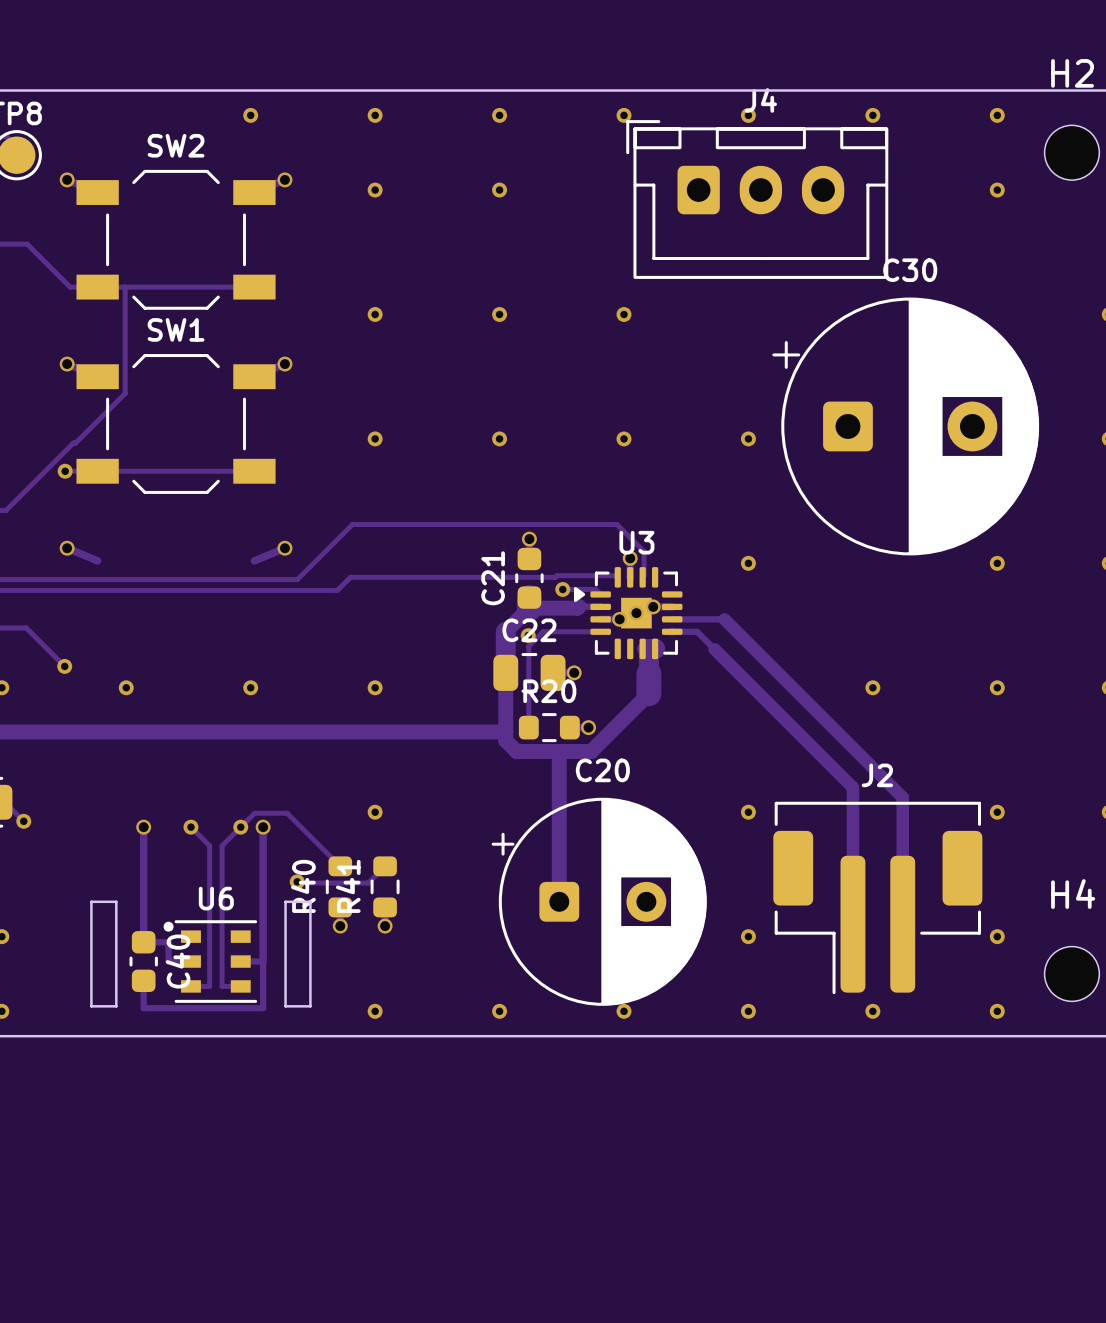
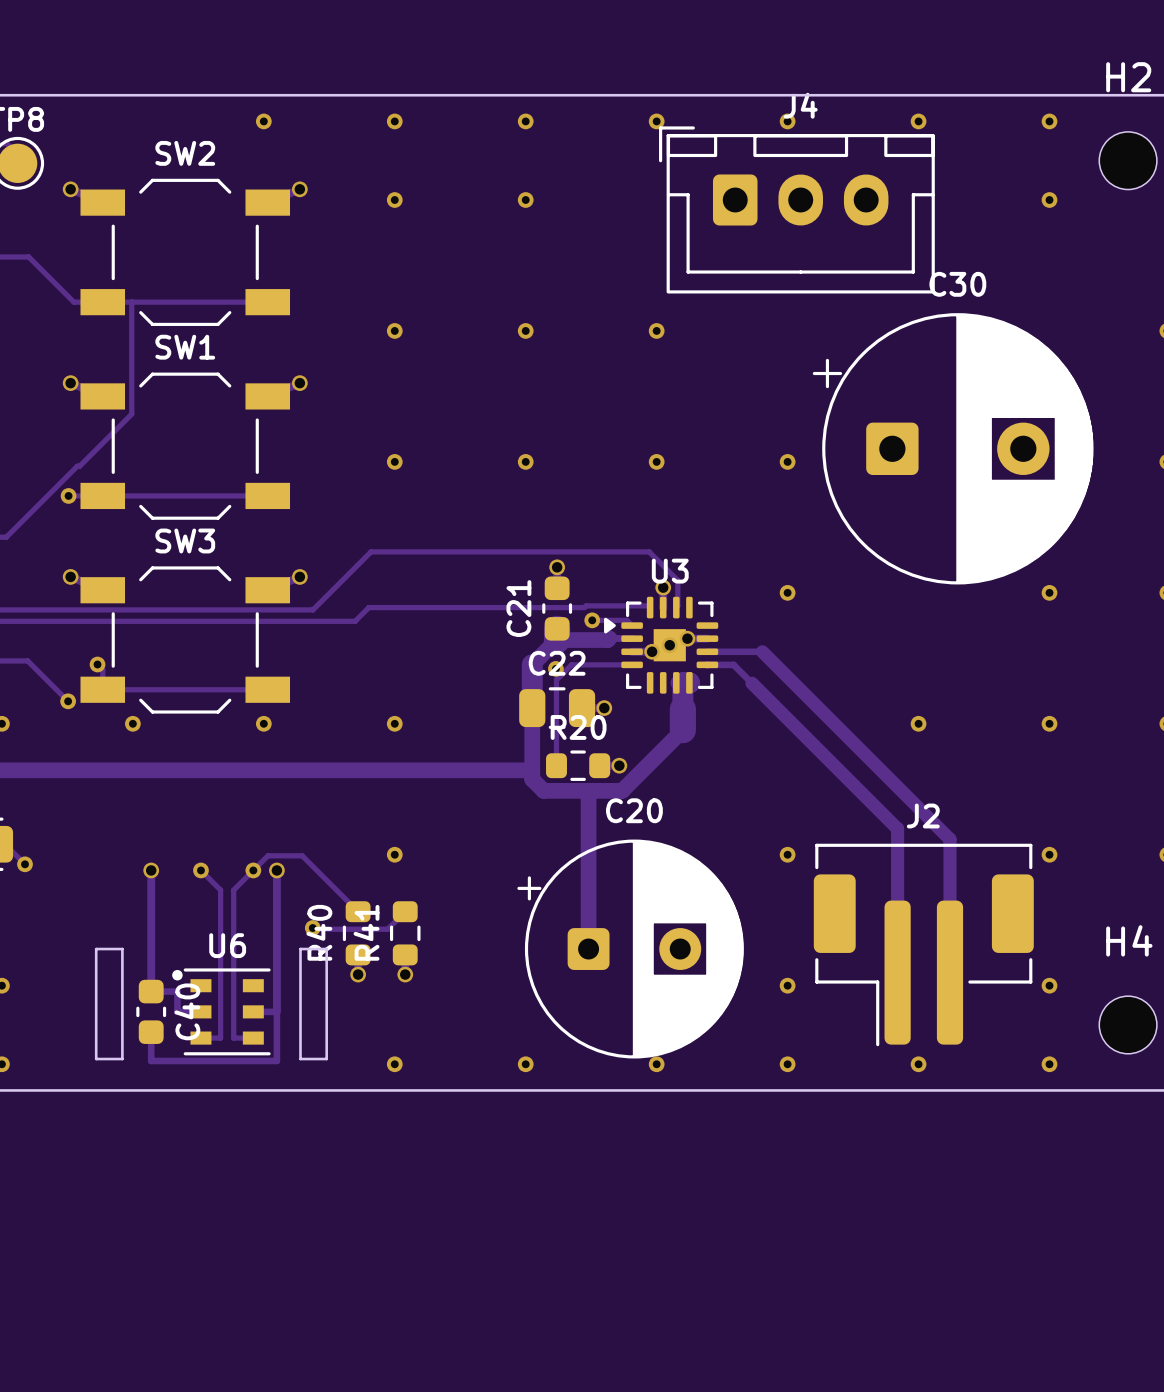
SW3: none -> (185, 639)
track: none -> (97, 664) (102, 669) (102, 689) (267, 689)
via: none -> (97, 664)

